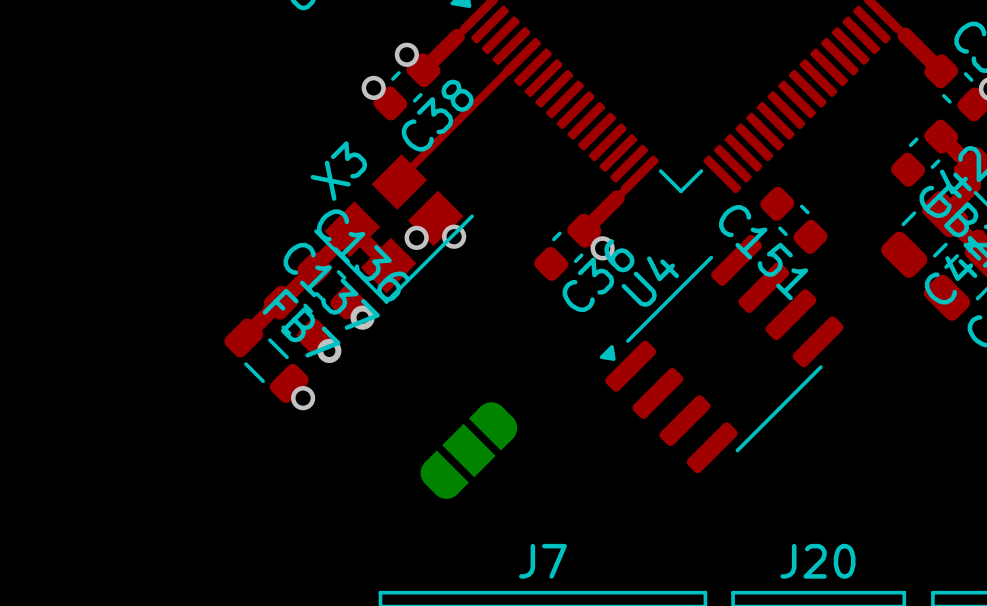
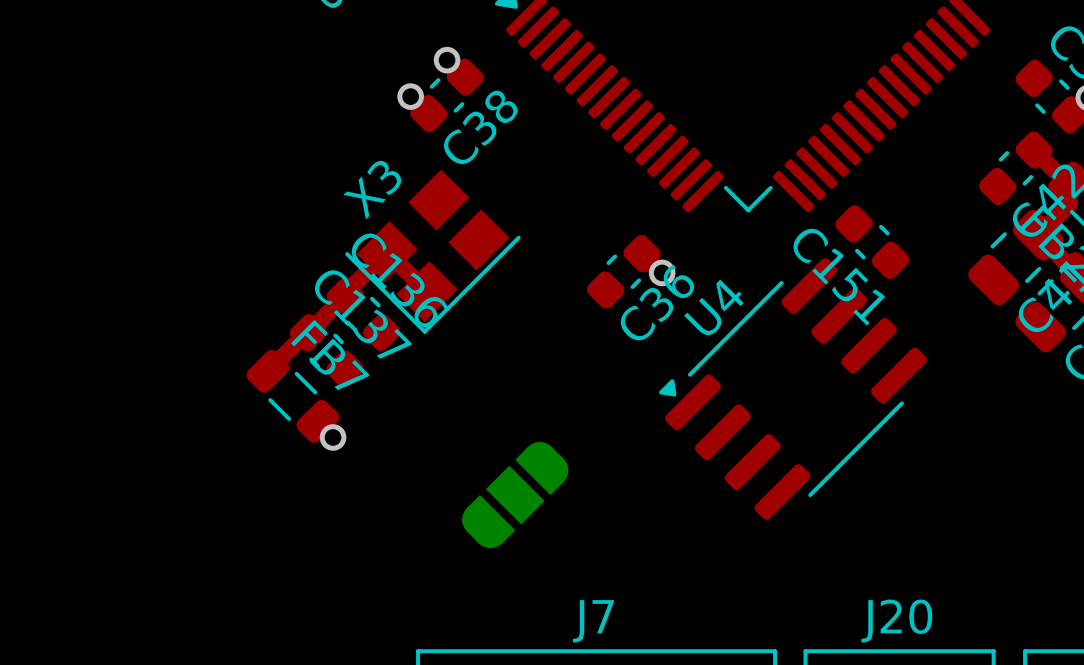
top track: (882, 13) (941, 71) -> none
top track: (479, 14) (423, 70) -> none
top track: (522, 56) (400, 178) (399, 182) -> none
top track: (639, 174) (584, 230) -> none
via: (454, 236) -> none
via: (416, 237) -> none
via: (362, 317) -> none
via: (329, 350) -> none

